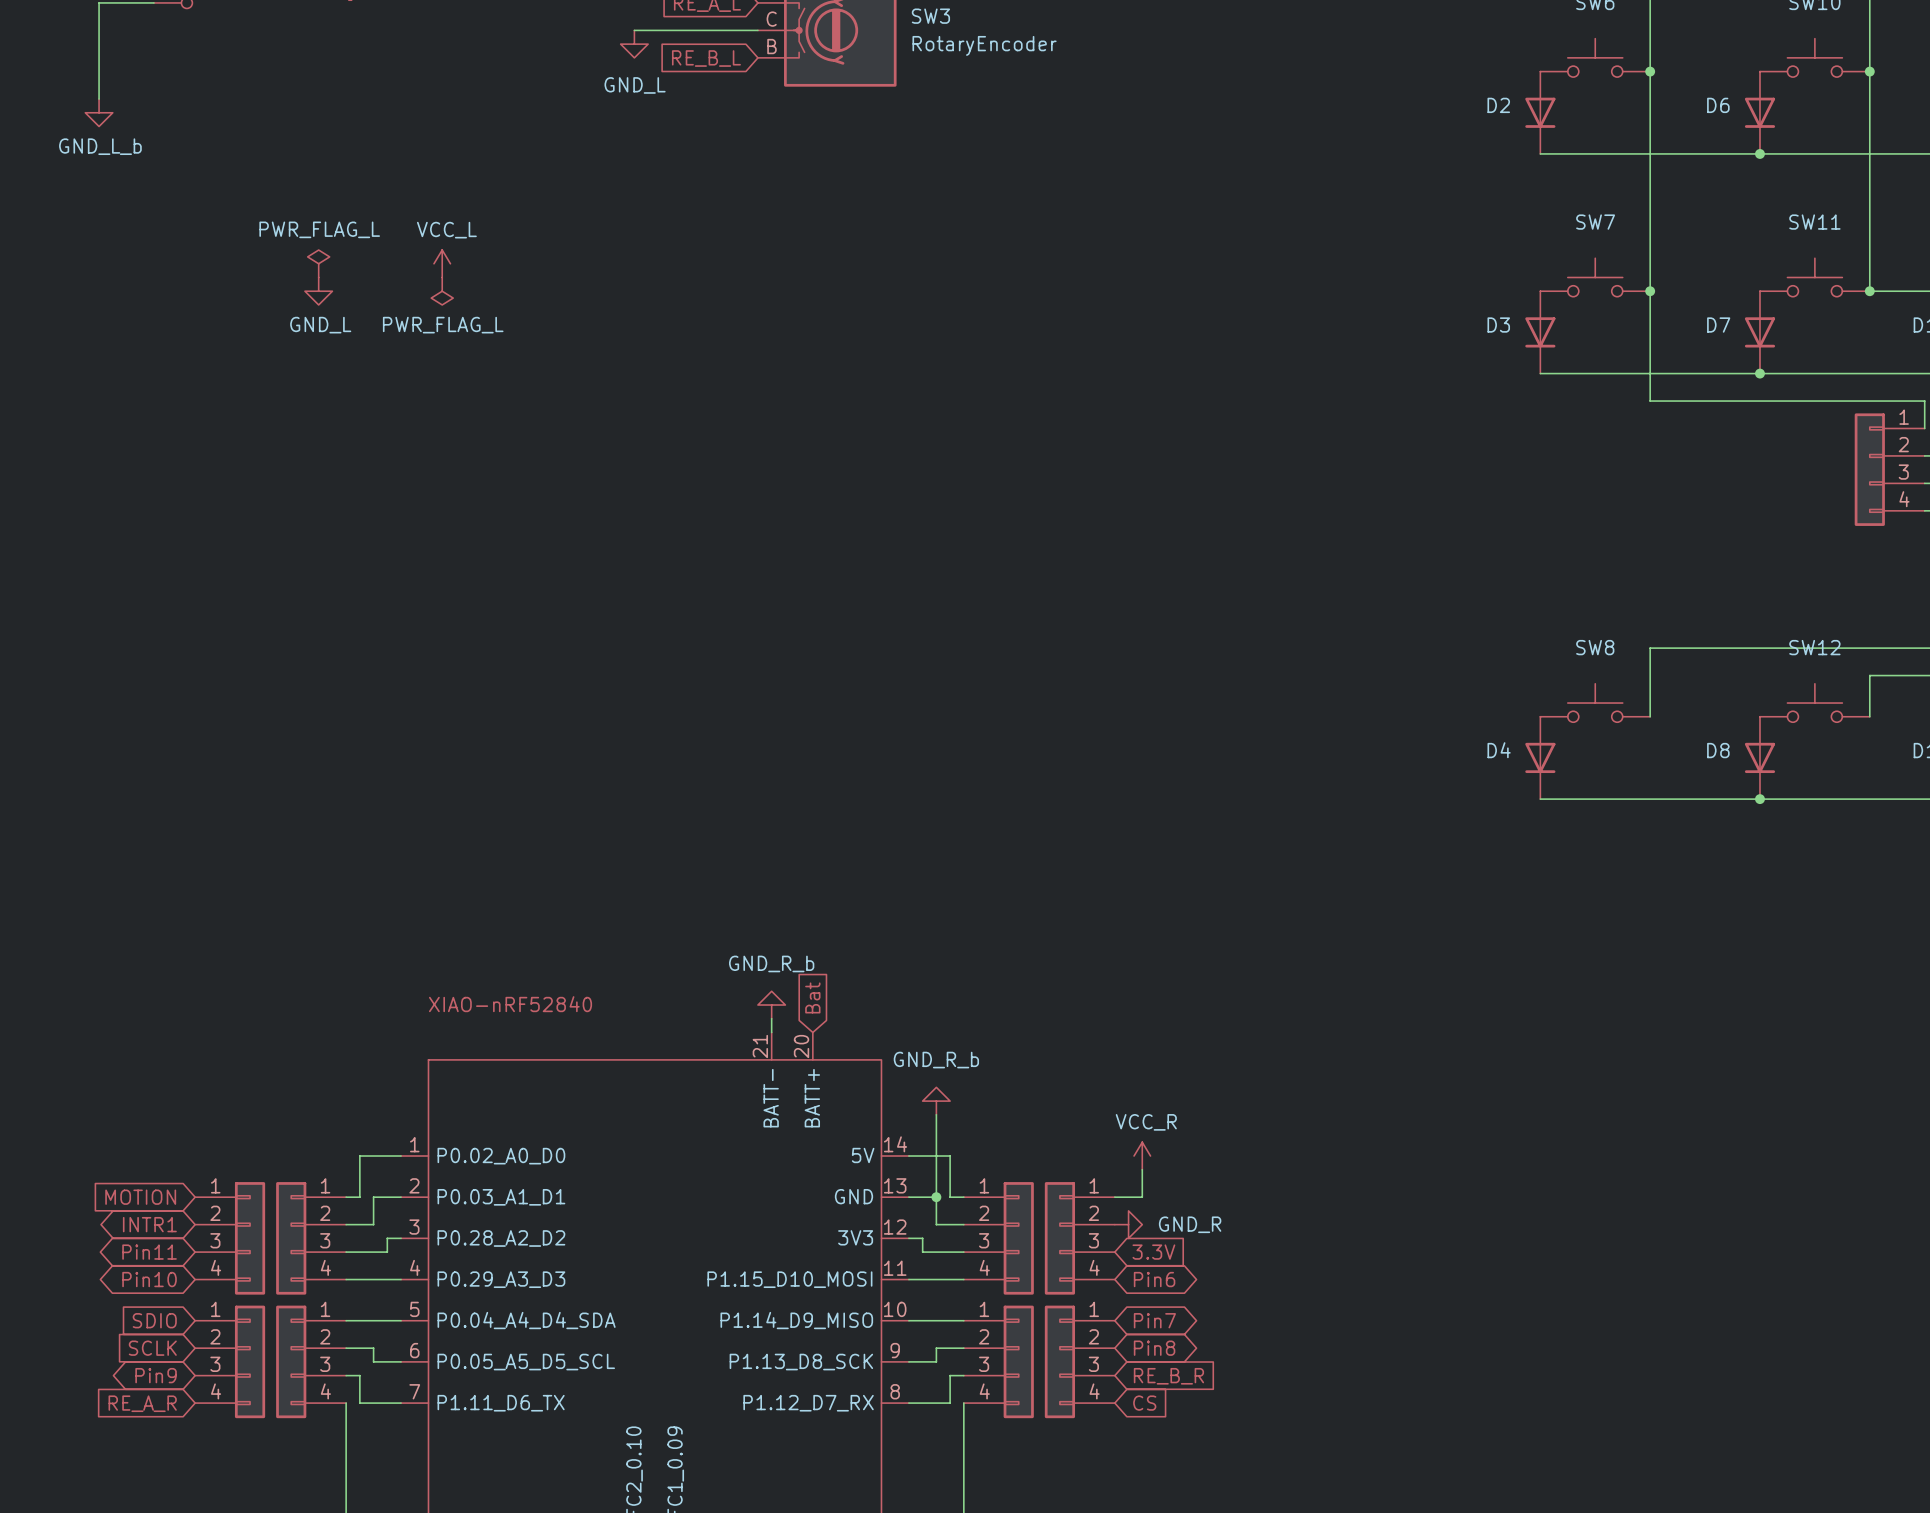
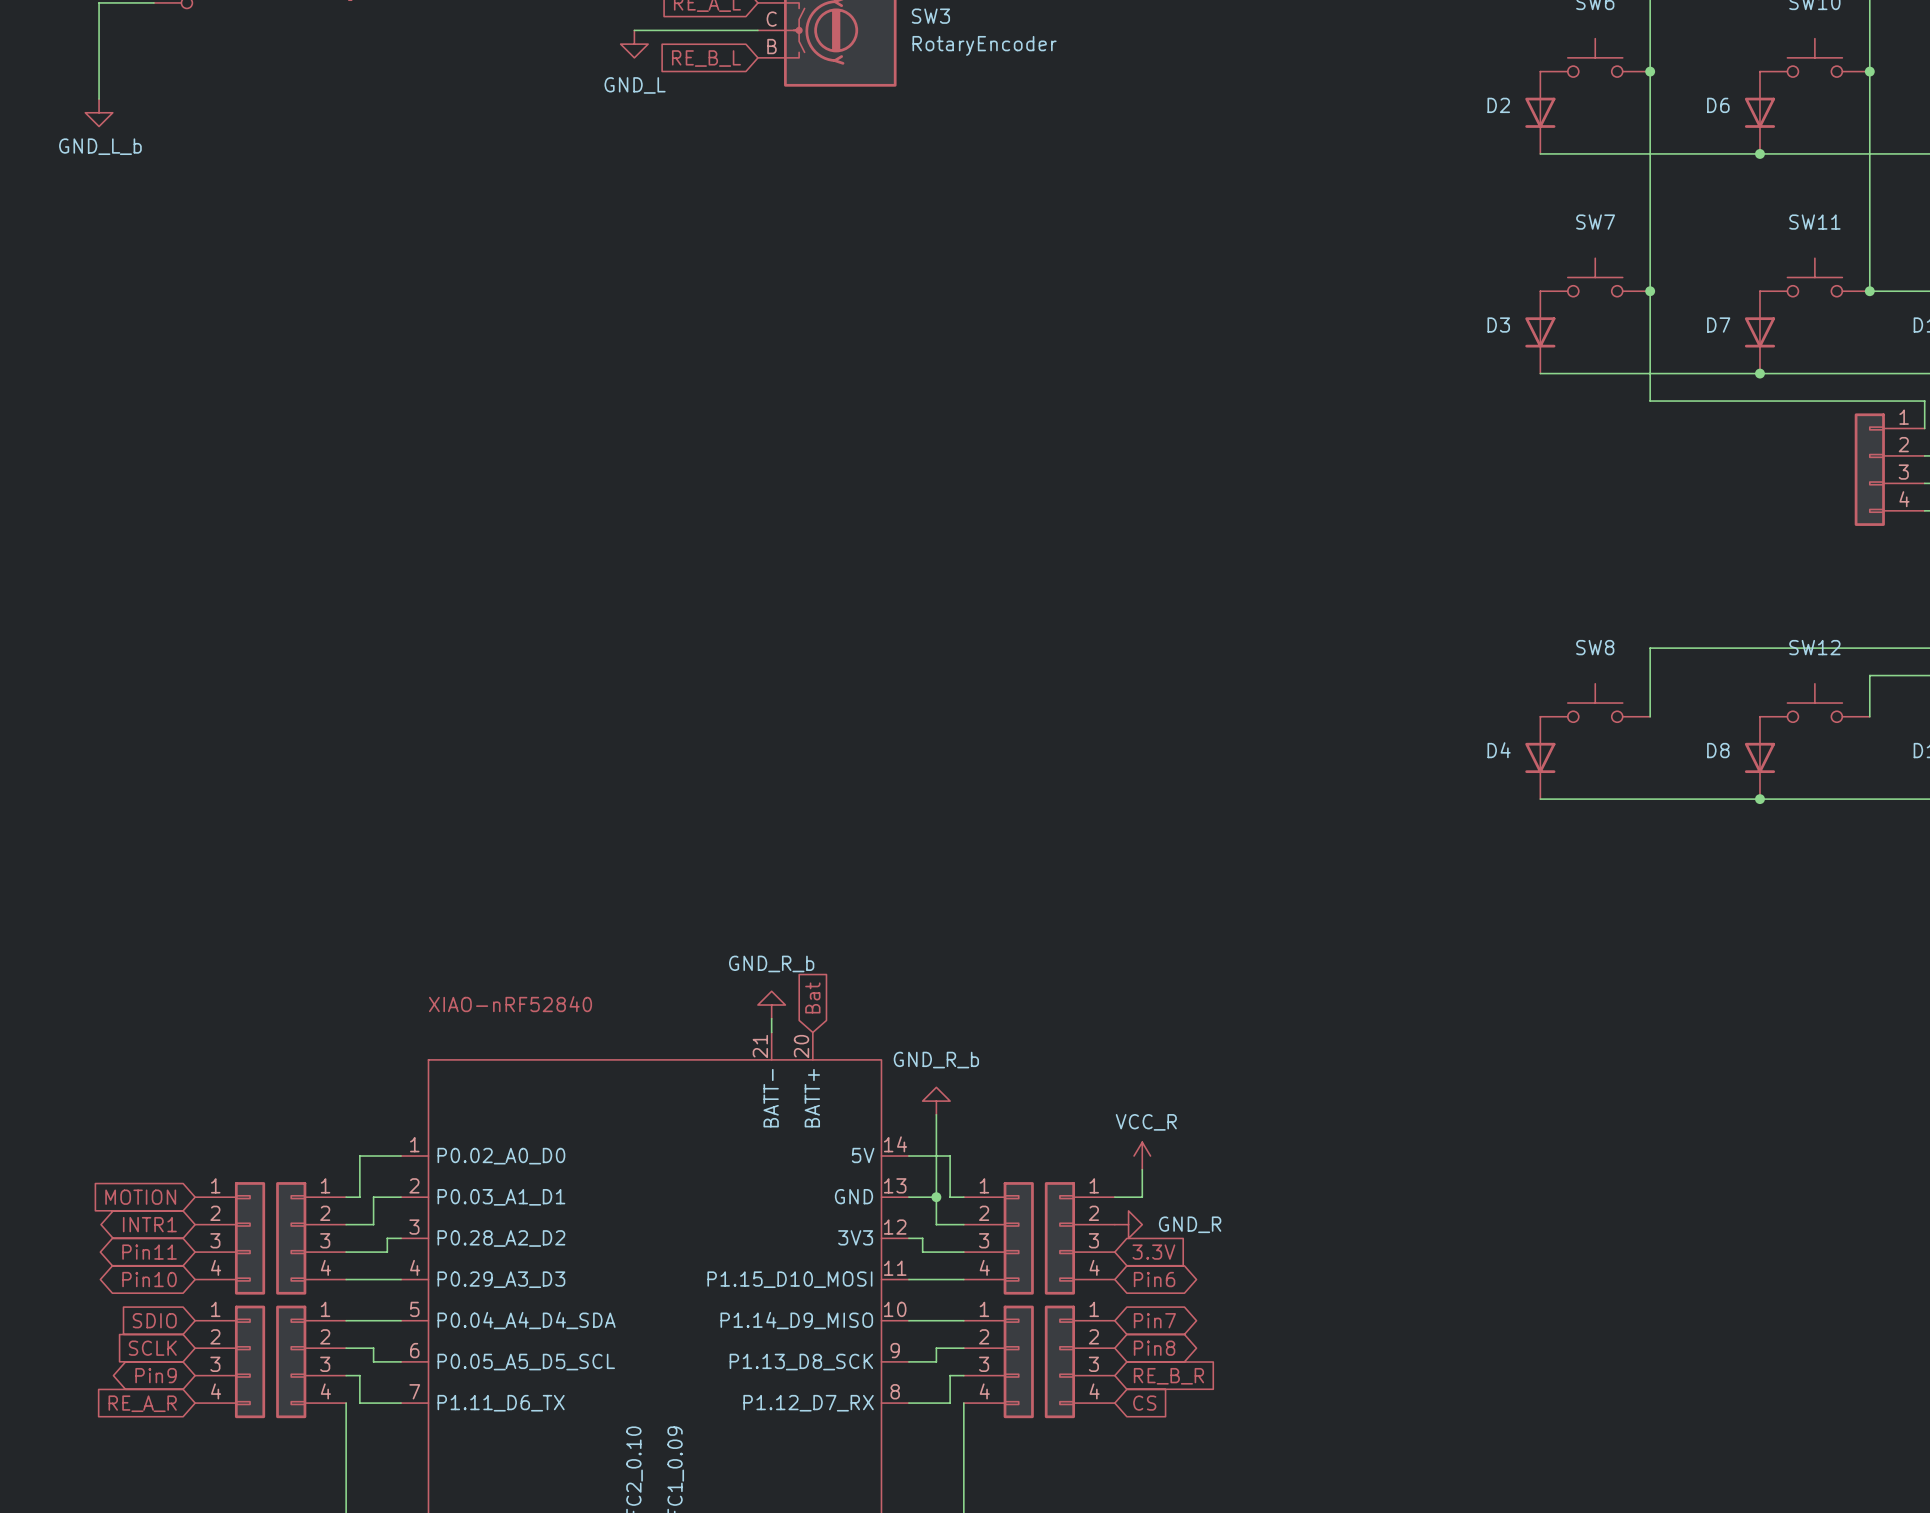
power symbol: PWR_FLAG_L (318, 263) -> none
power symbol: VCC_L (442, 263) -> none
power symbol: GND_L (318, 291) -> none
power symbol: PWR_FLAG_L (442, 291) -> none

